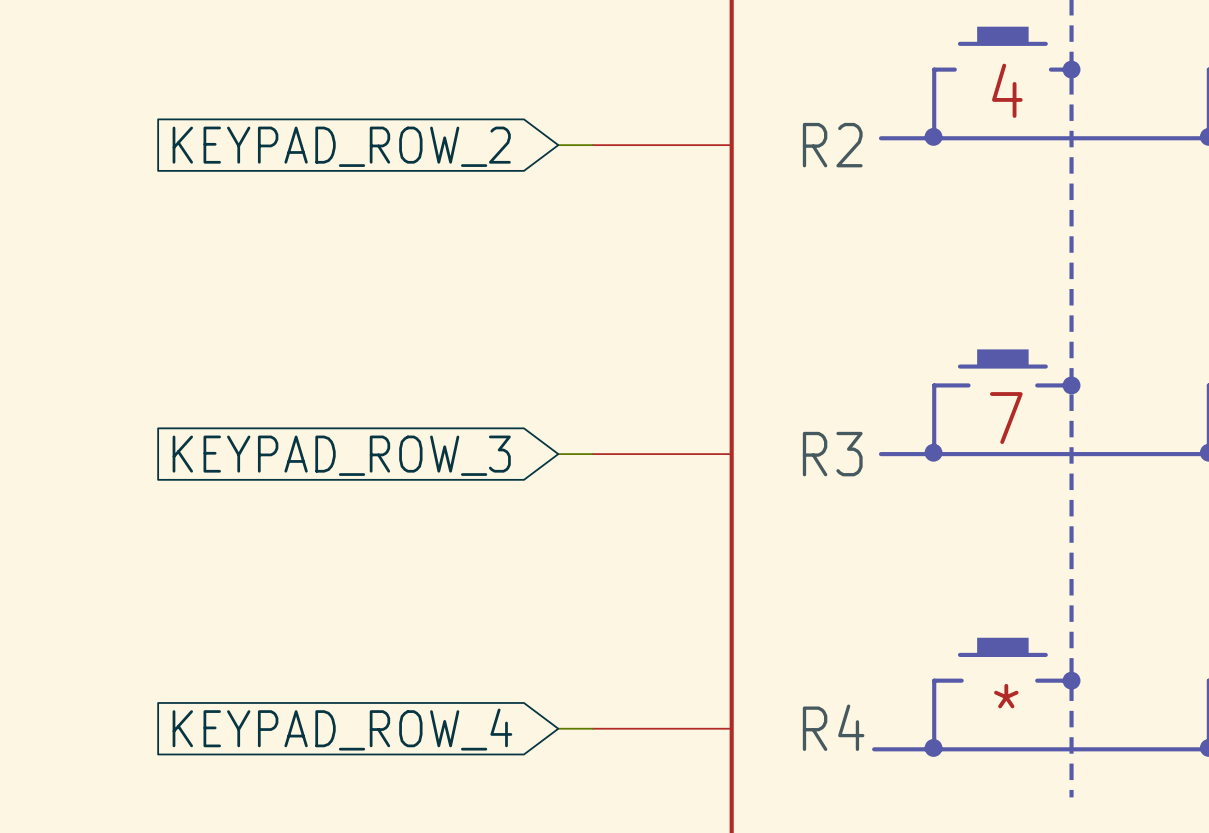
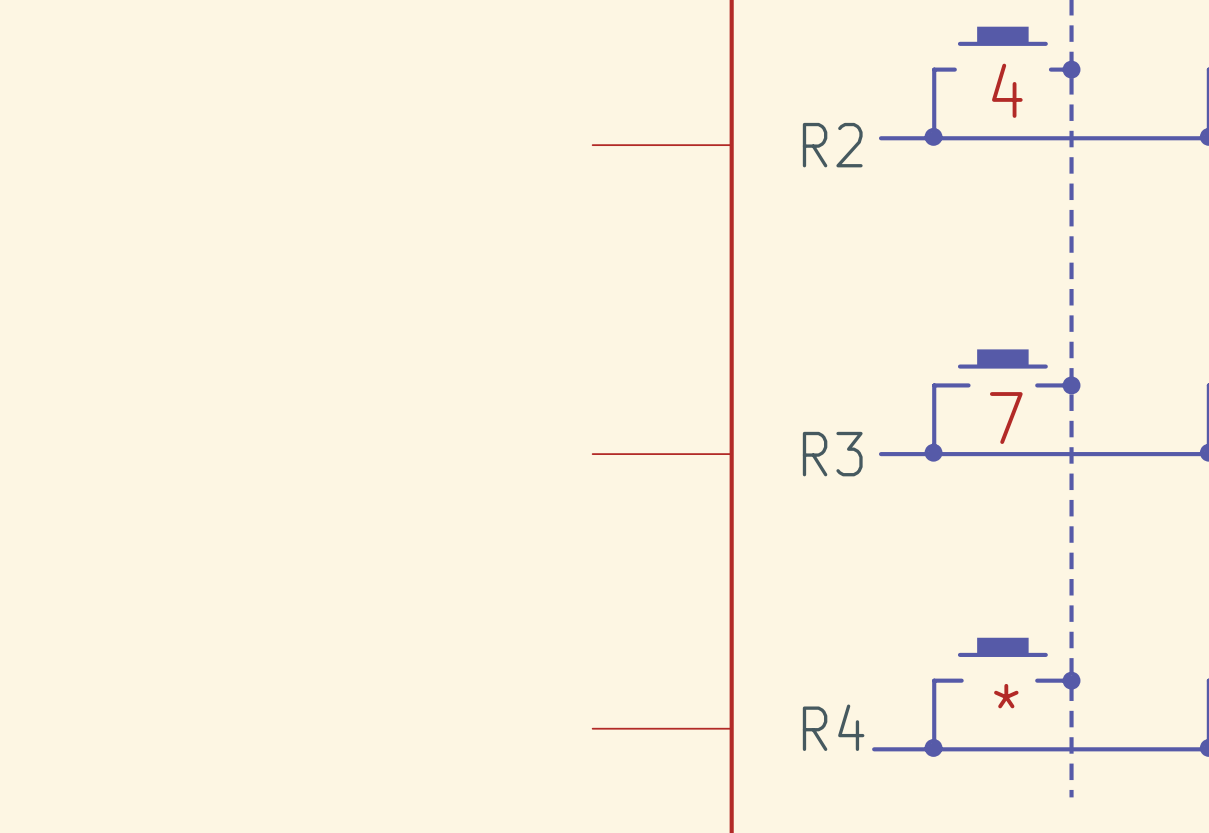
wire: (558, 145) (592, 145) -> none
global label: KEYPAD_ROW_2 (341, 146) -> none
wire: (558, 454) (592, 454) -> none
global label: KEYPAD_ROW_3 (341, 455) -> none
wire: (558, 728) (592, 728) -> none
global label: KEYPAD_ROW_4 (342, 729) -> none

